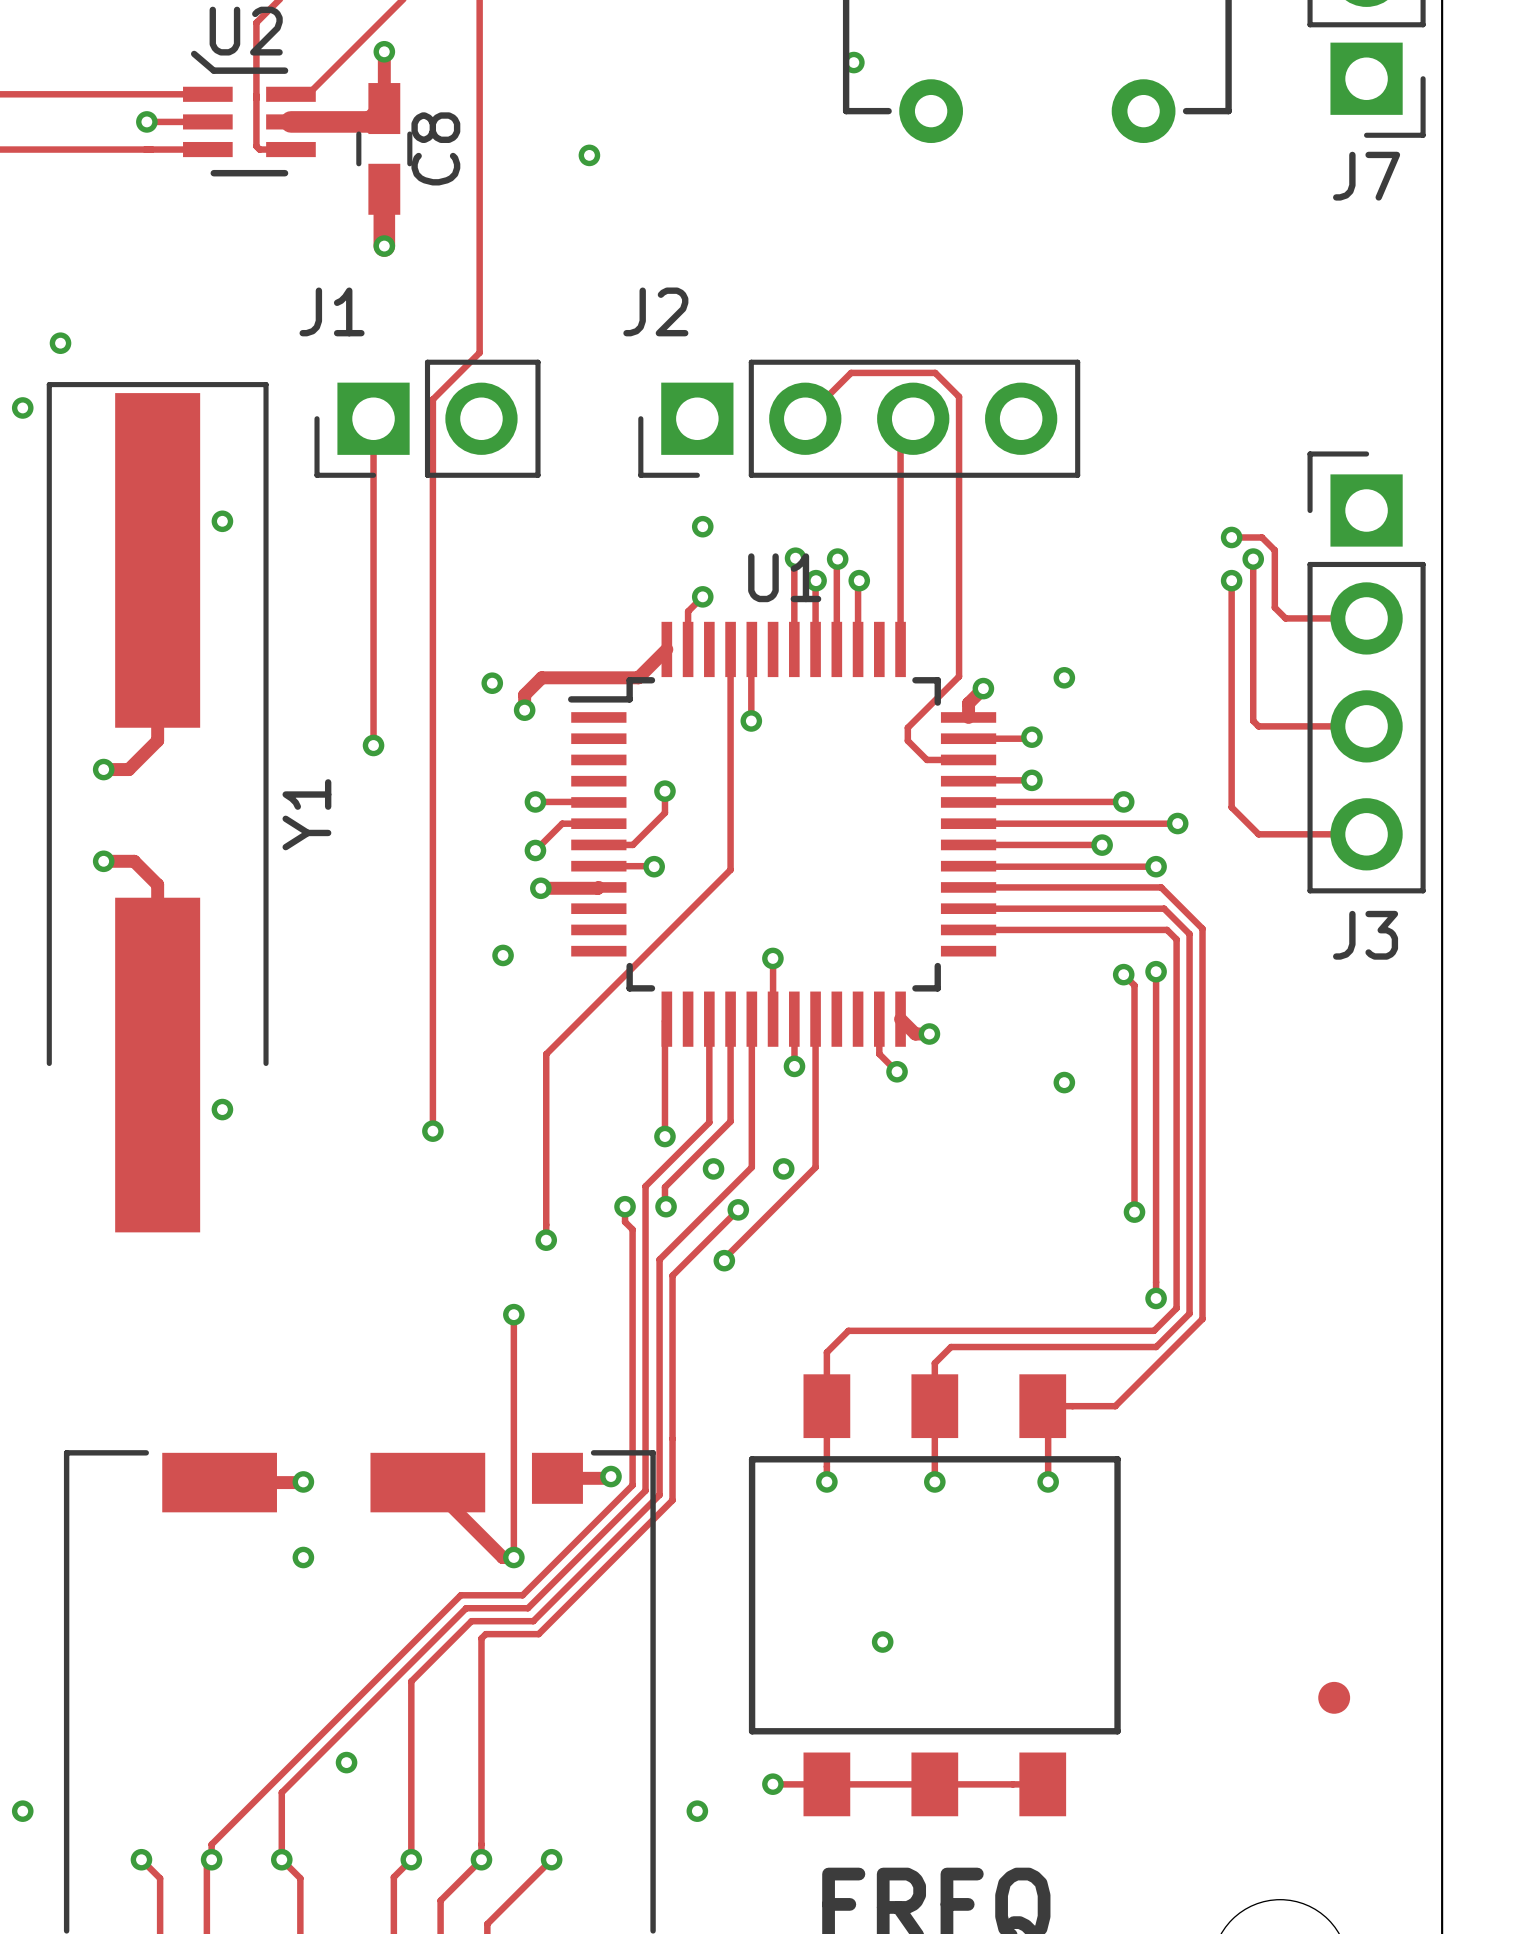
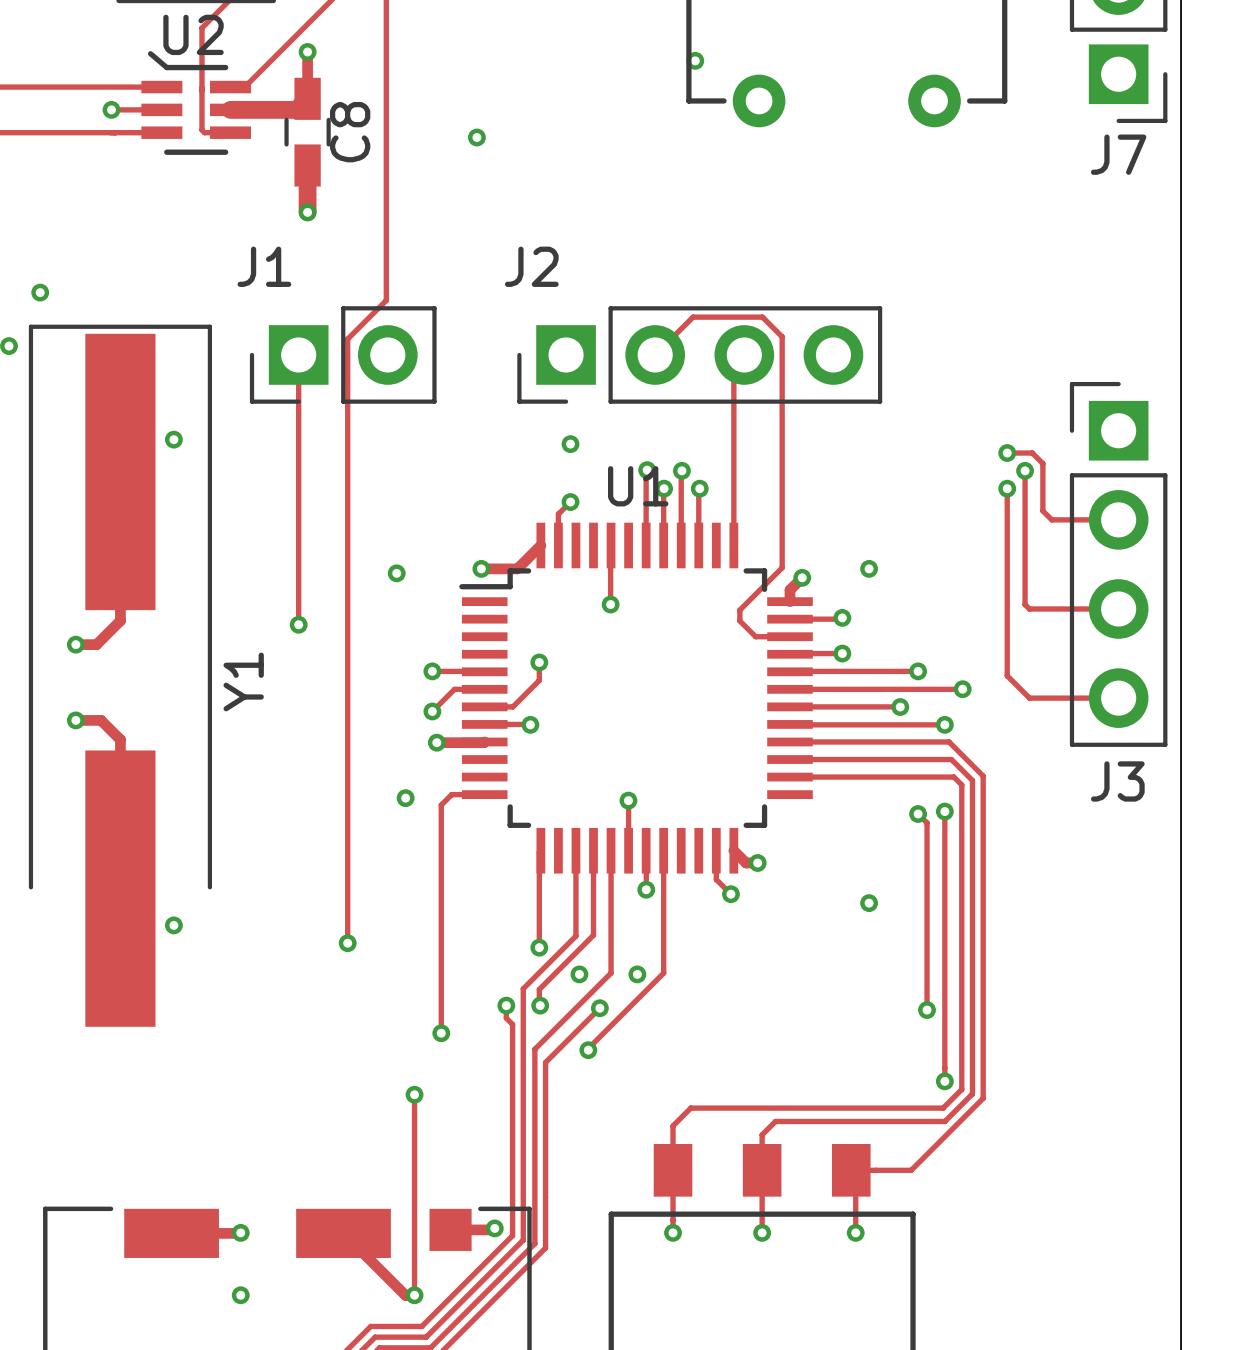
track: (730, 649) (730, 869) (546, 1054) -> (484, 794) (451, 794) (441, 805) (441, 879)
track: (594, 677) (541, 677) (524, 694) (524, 710) -> none
via position: (524, 710) -> (481, 568)

